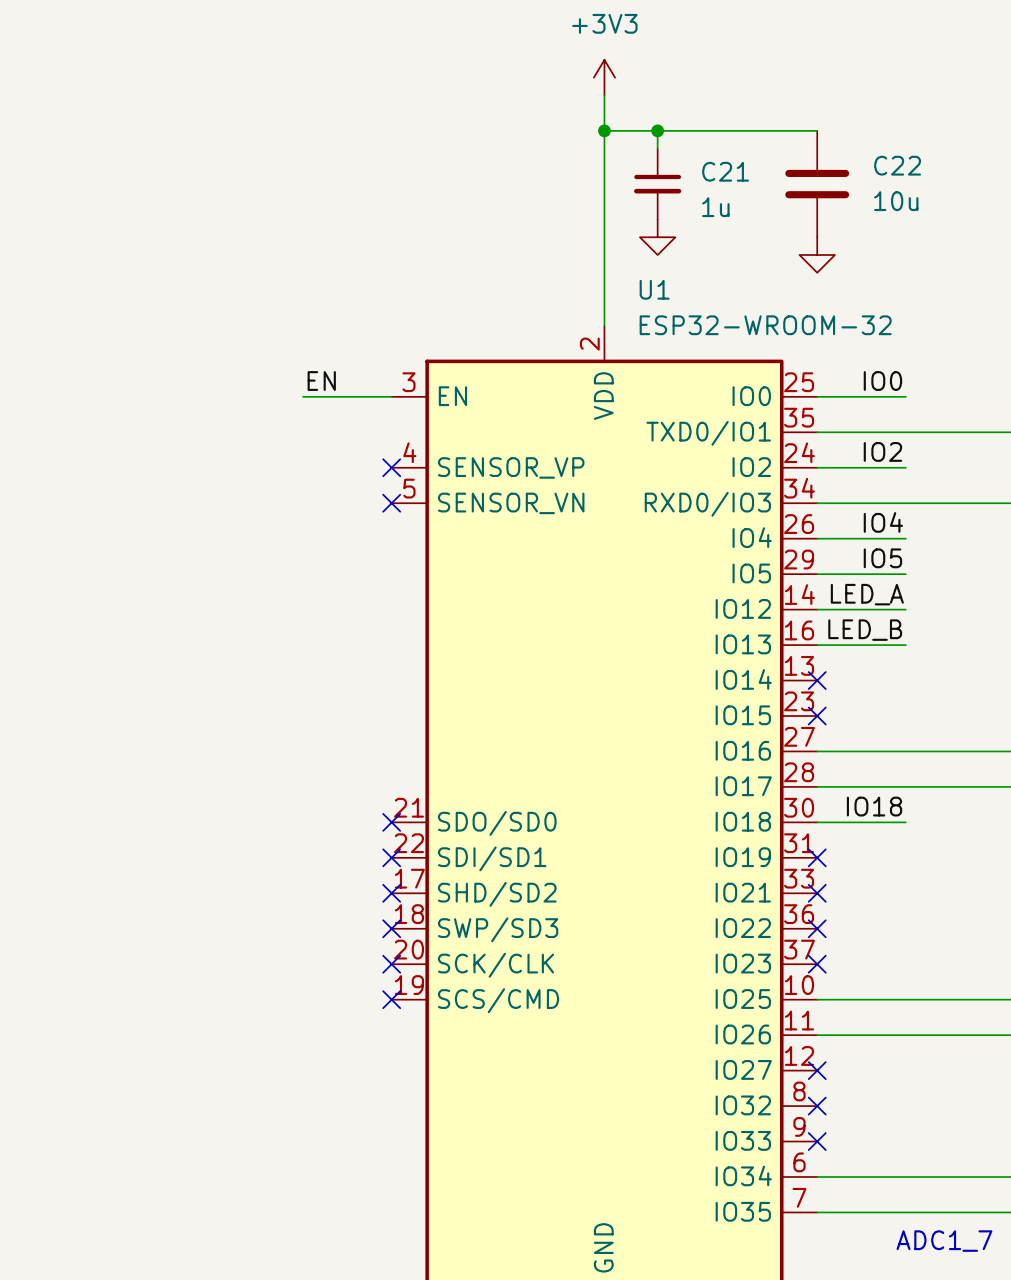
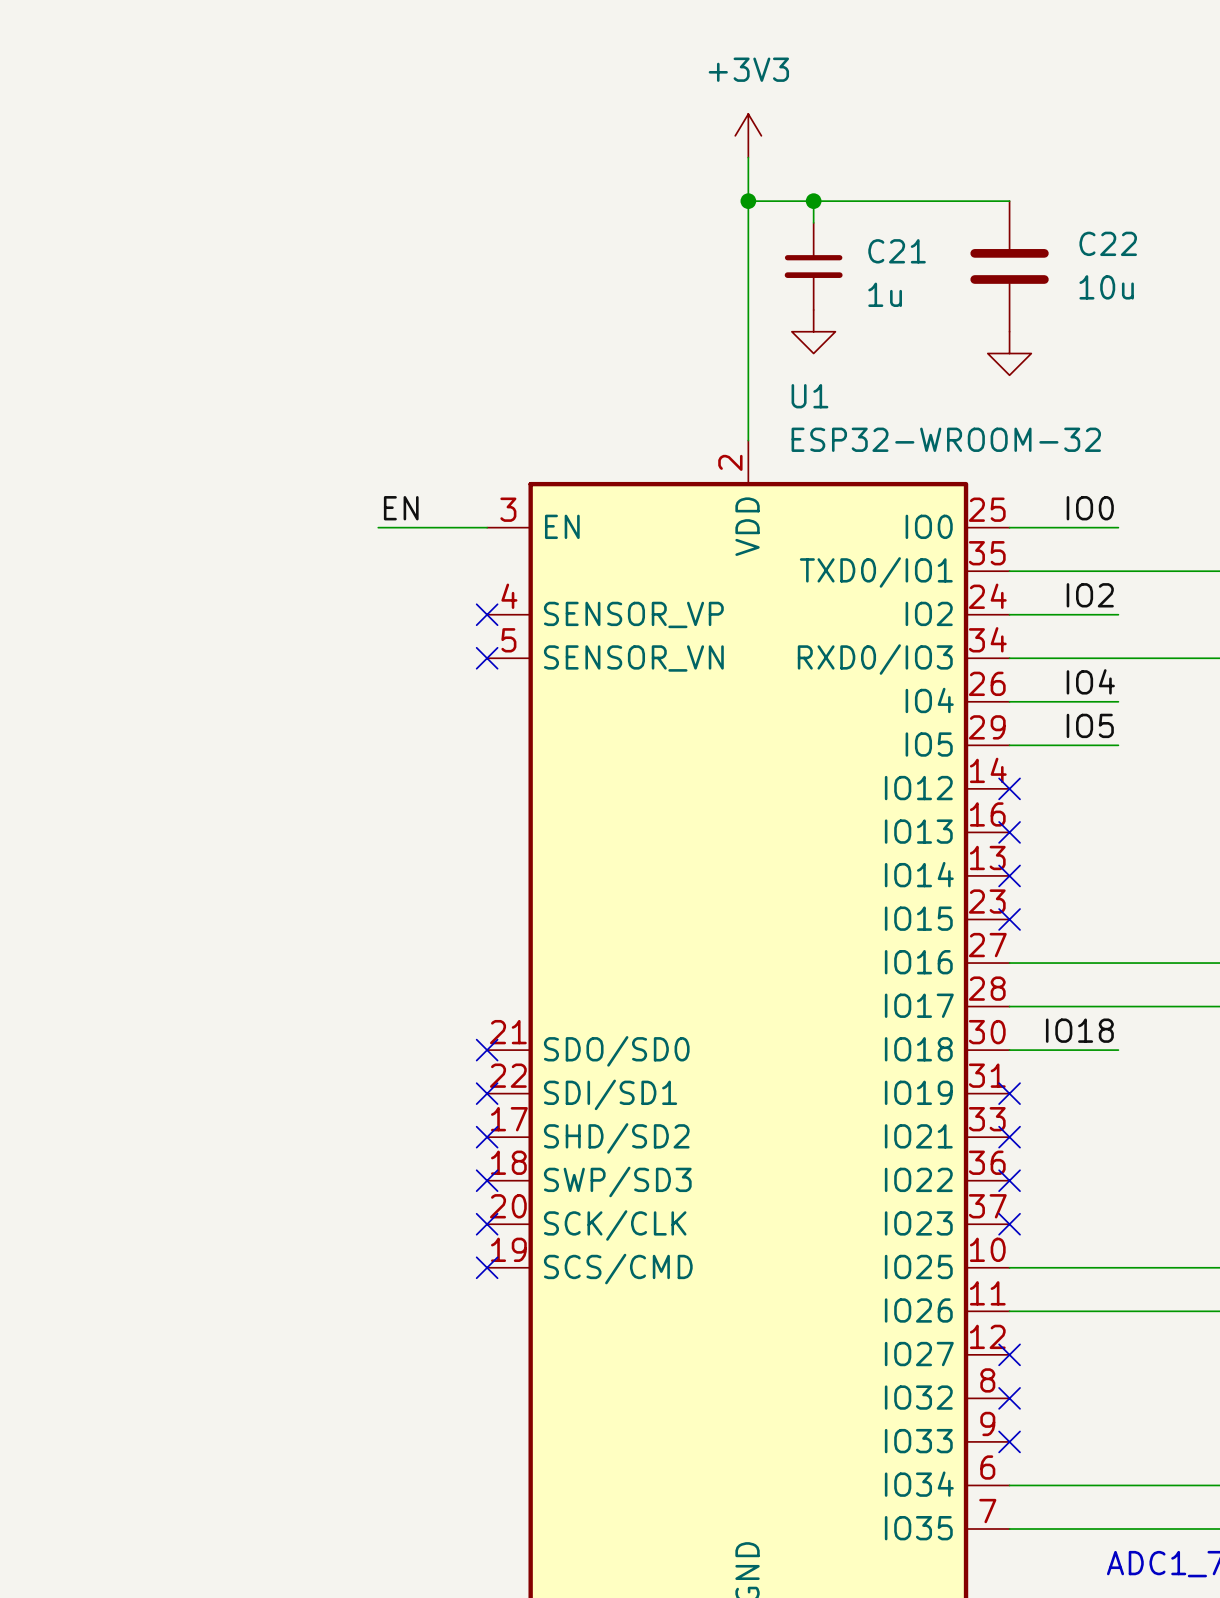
label: LED_A (867, 594) -> none
wire: (817, 609) (905, 609) -> none
no-connect mark: none -> (1009, 788)
label: LED_B (865, 630) -> none
wire: (817, 645) (905, 645) -> none
no-connect mark: none -> (1009, 832)

